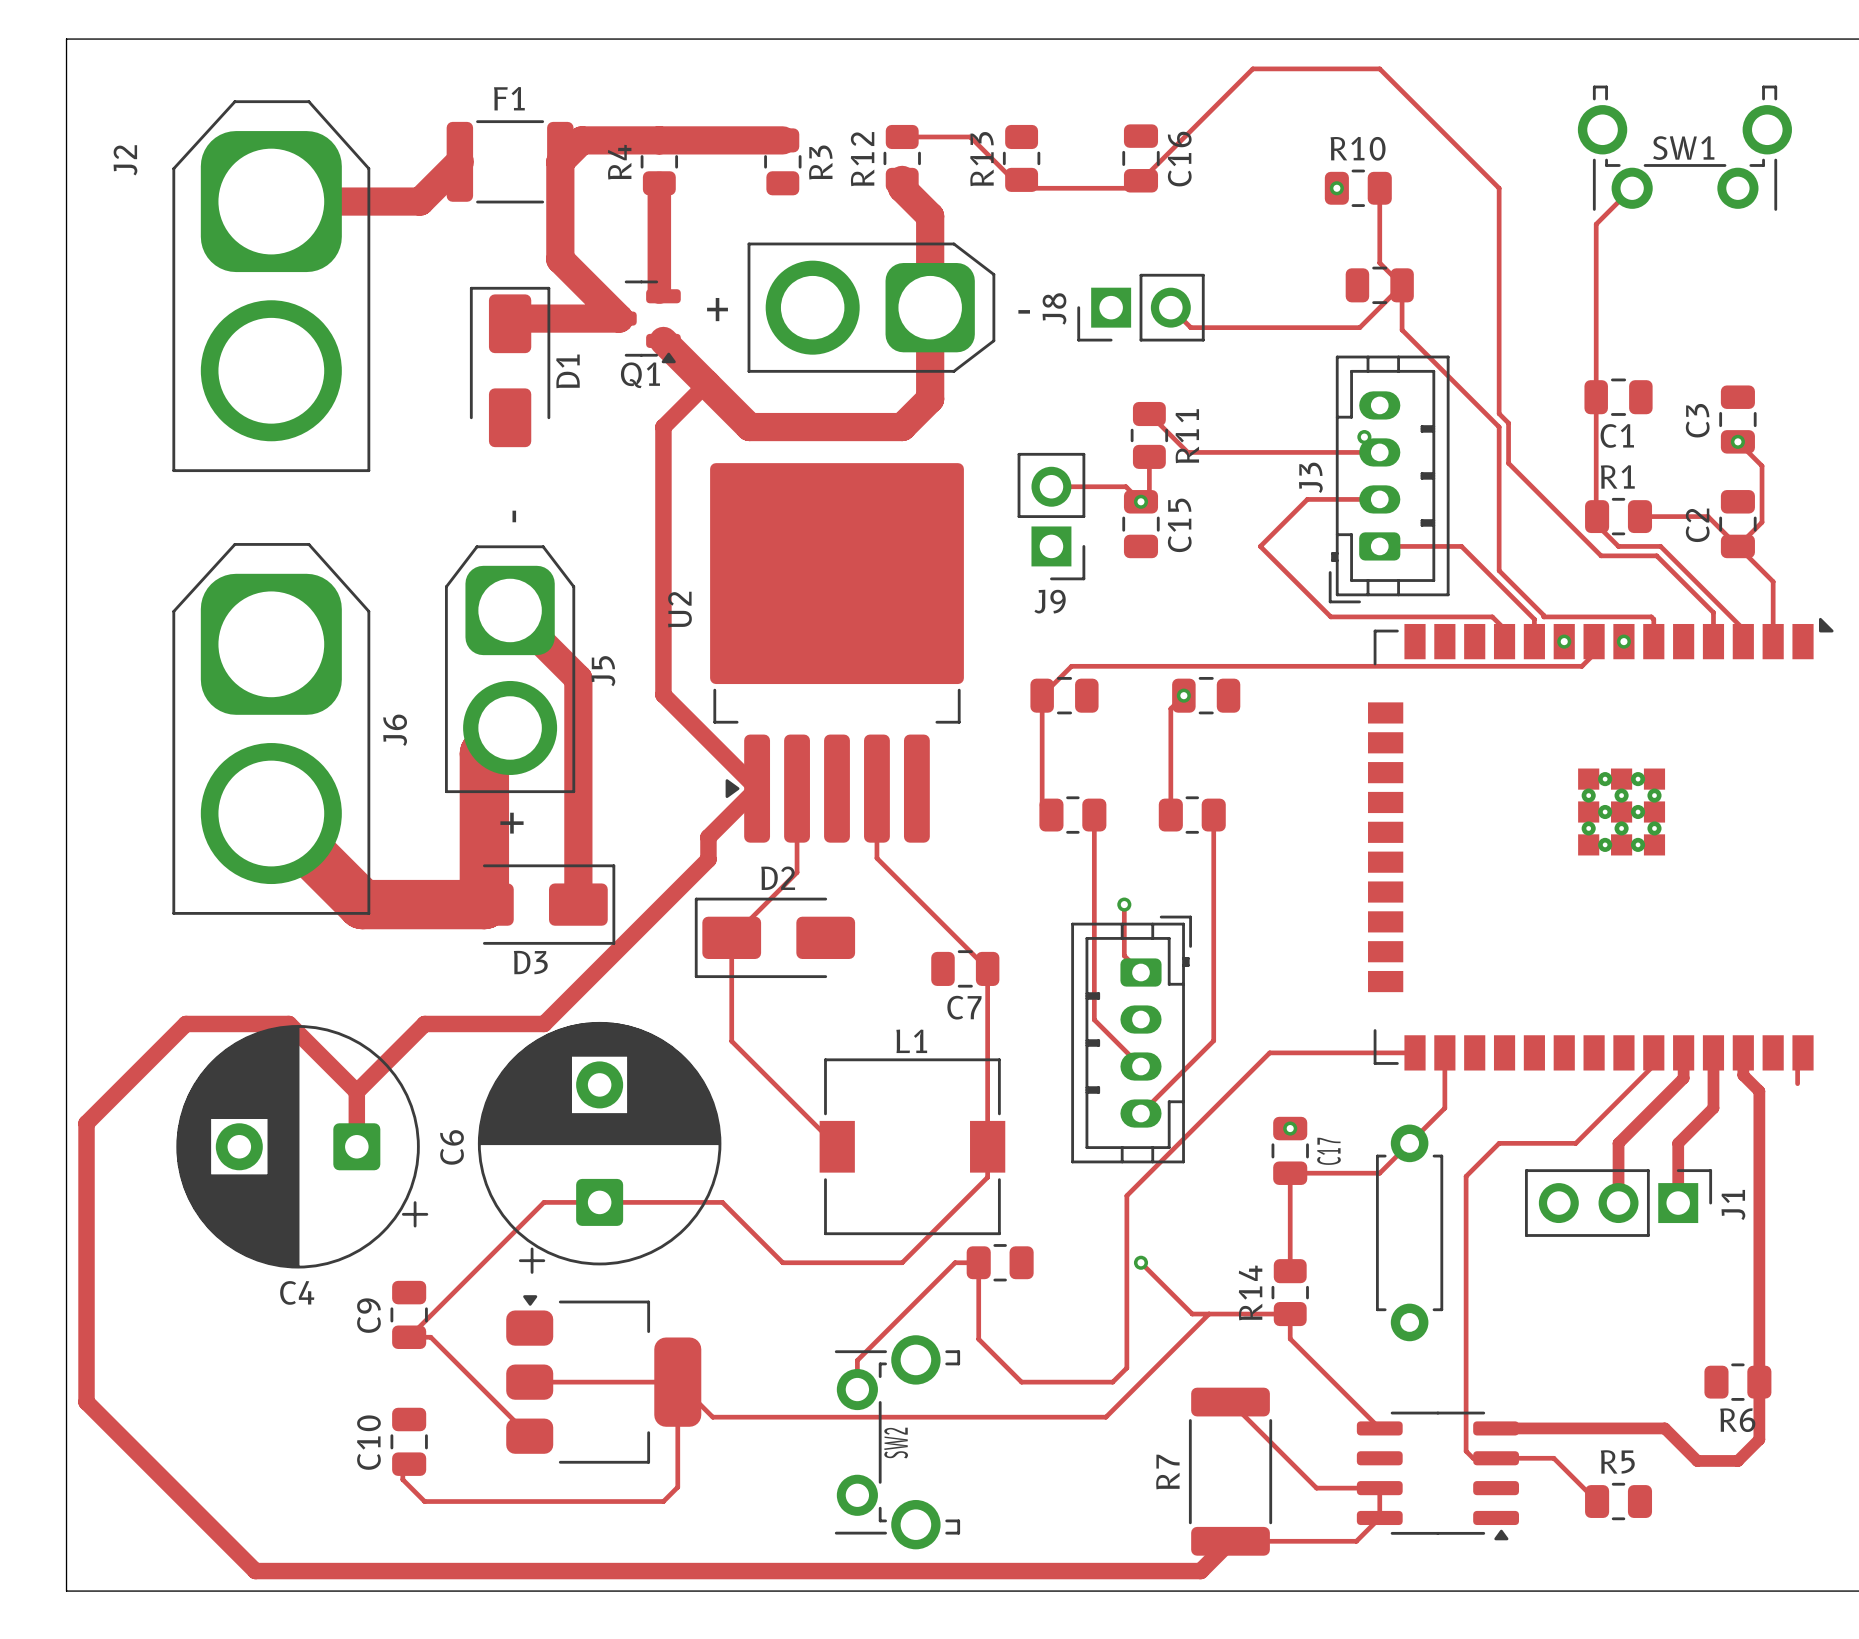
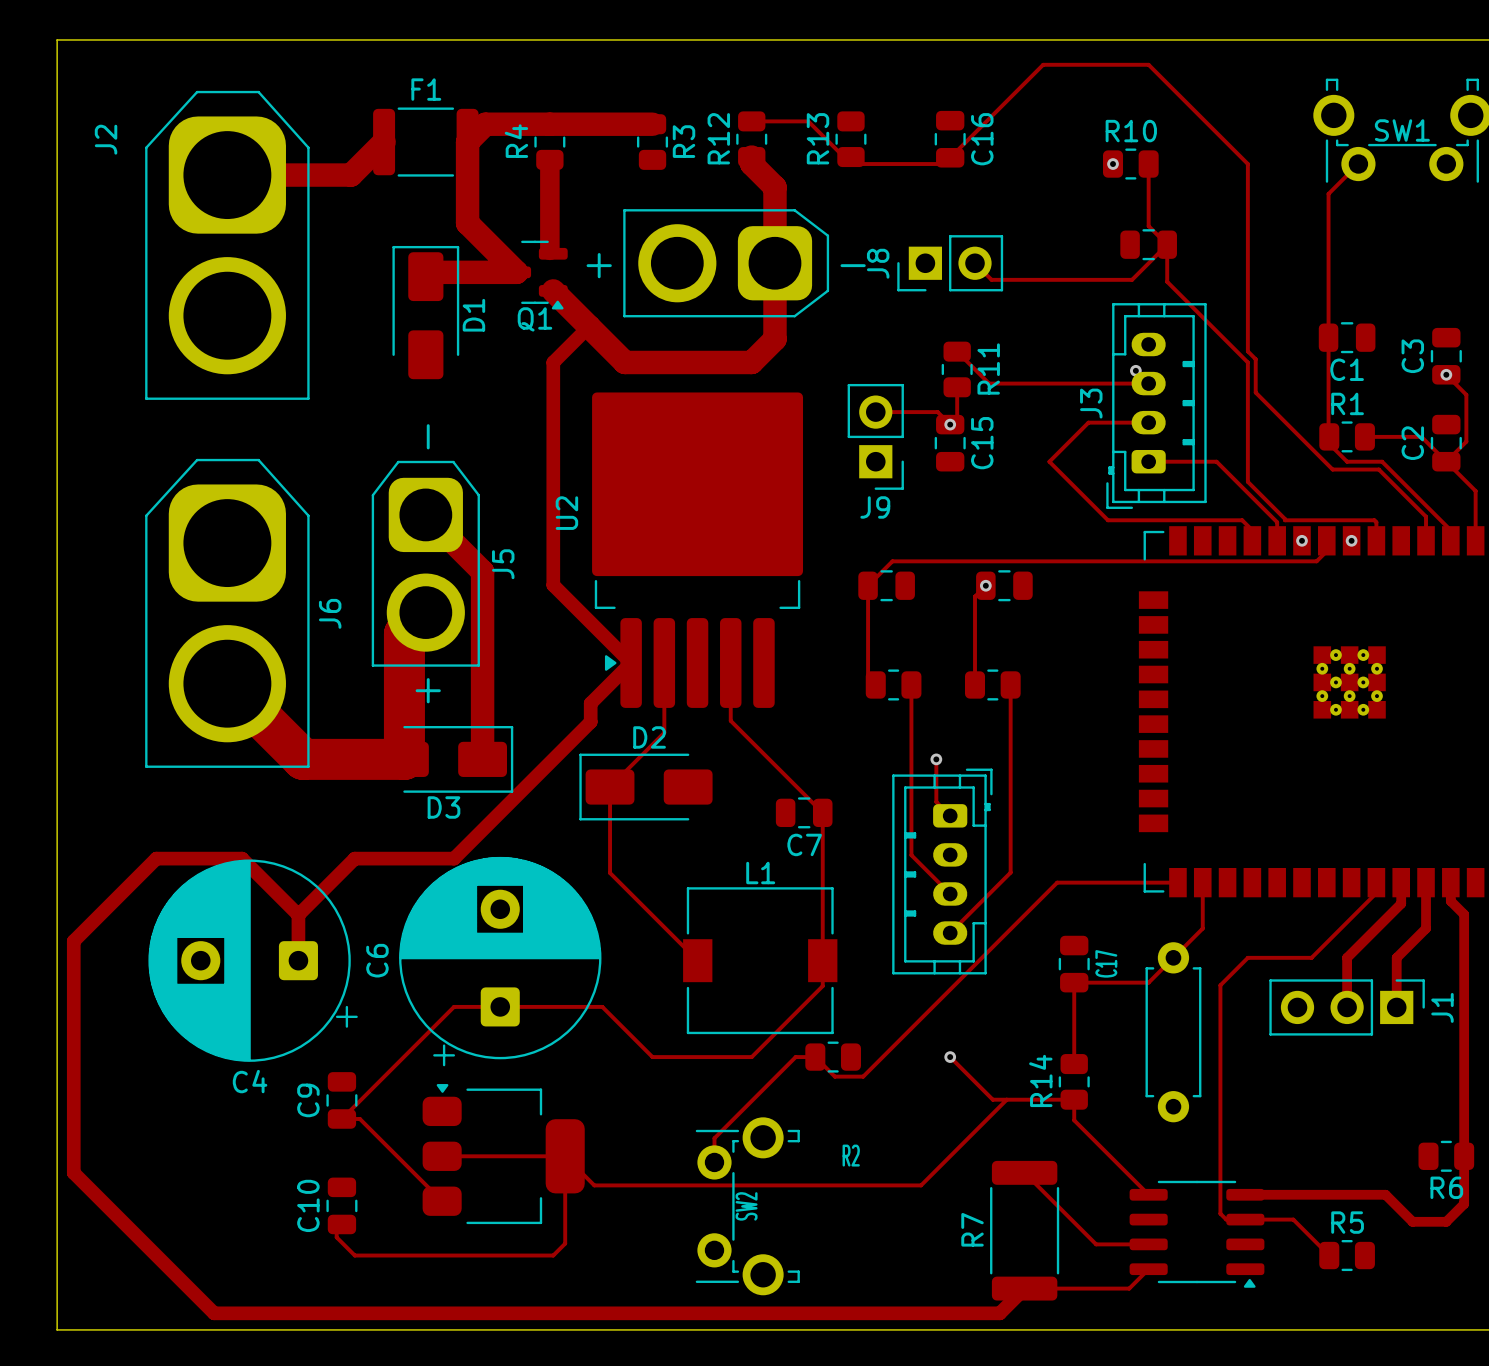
via: (1290, 1128) -> none
track: (1126, 1195) (1126, 1368) (1112, 1382) (1021, 1382) (978, 1339) (978, 1262) -> (938, 1001) (863, 1076) (834, 1076) (815, 1057)
R2 name: none -> R2 (851, 1155)
track: (1379, 1488) (1379, 1517) -> none

